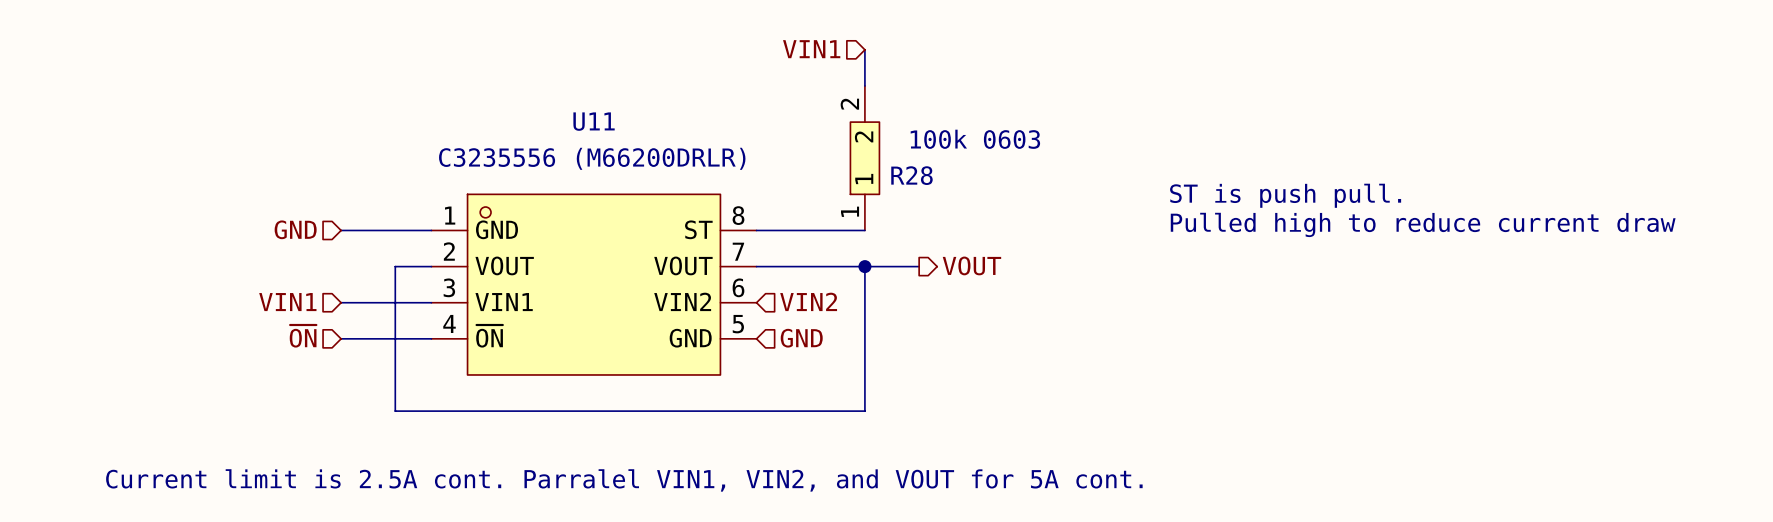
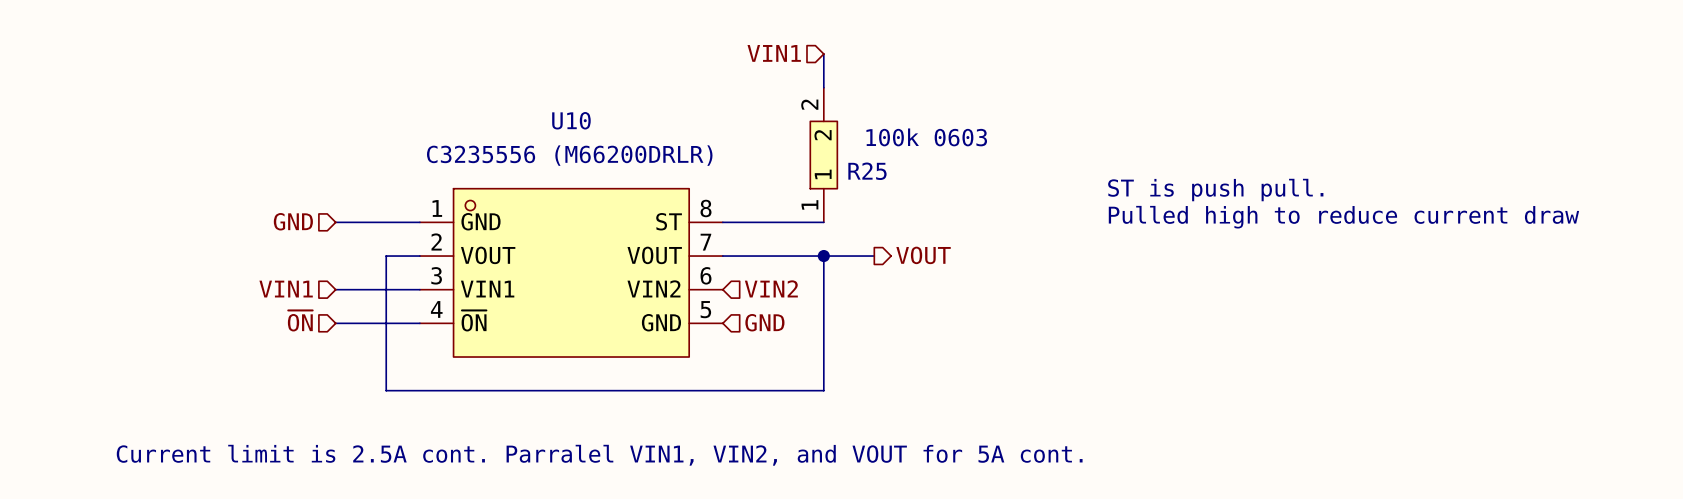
U11 name: U11 (594, 121) -> U10 (571, 120)
R28 name: R28 (911, 175) -> R25 (867, 171)

